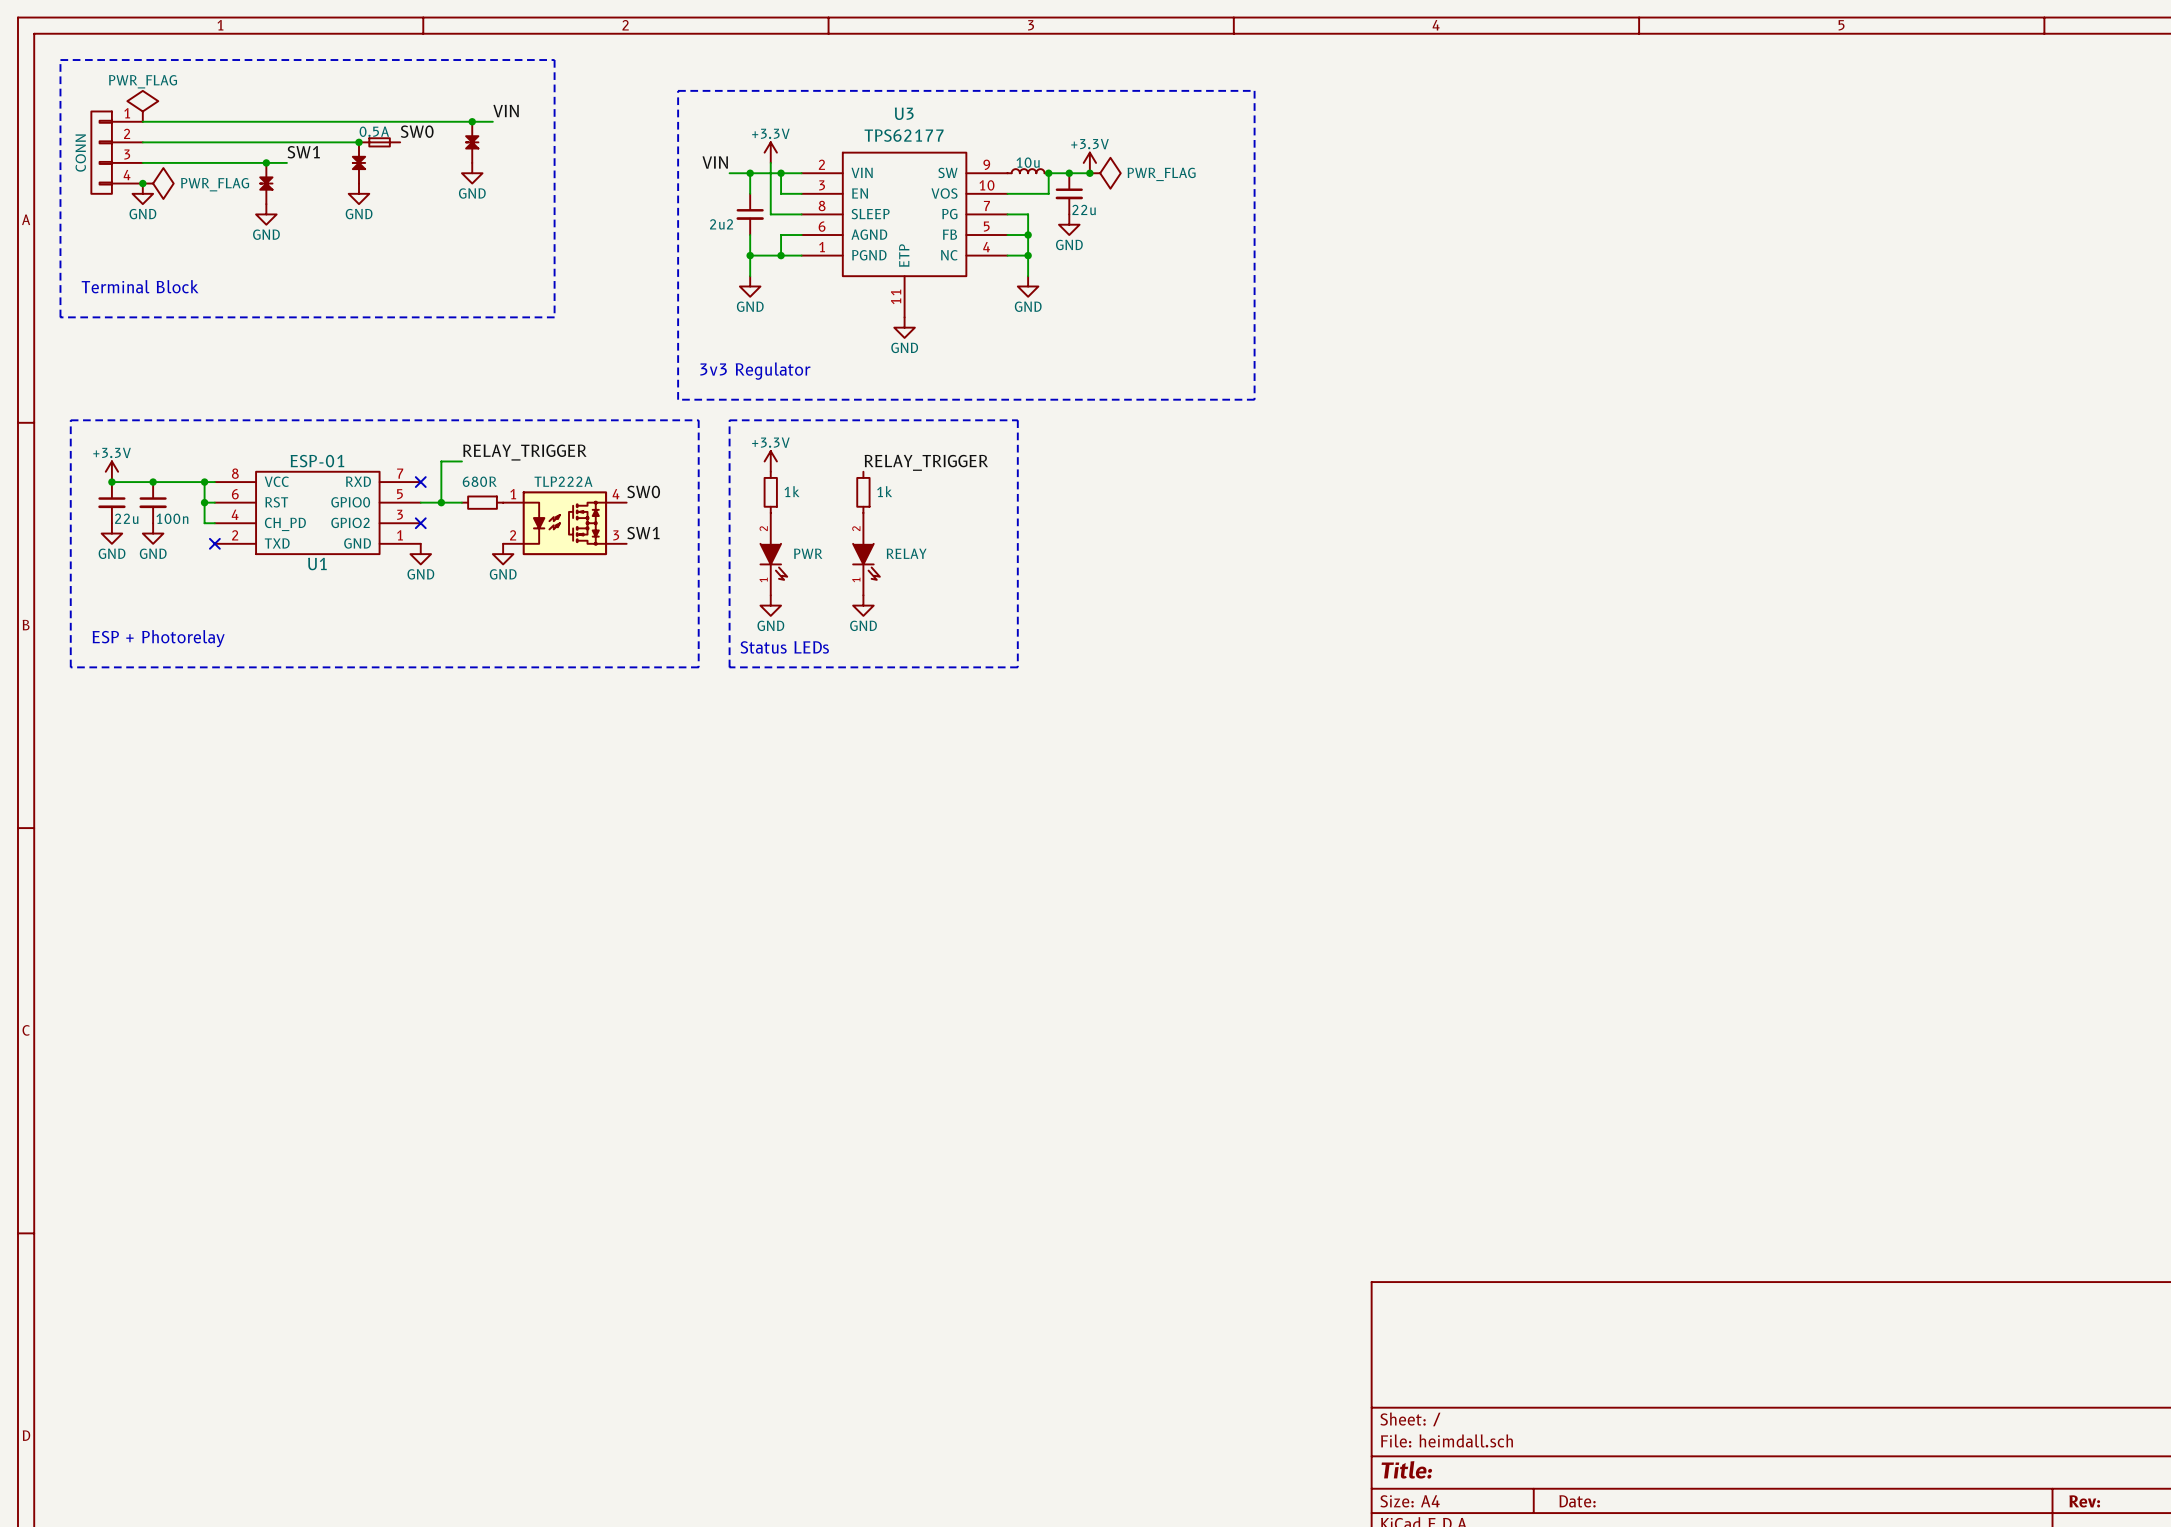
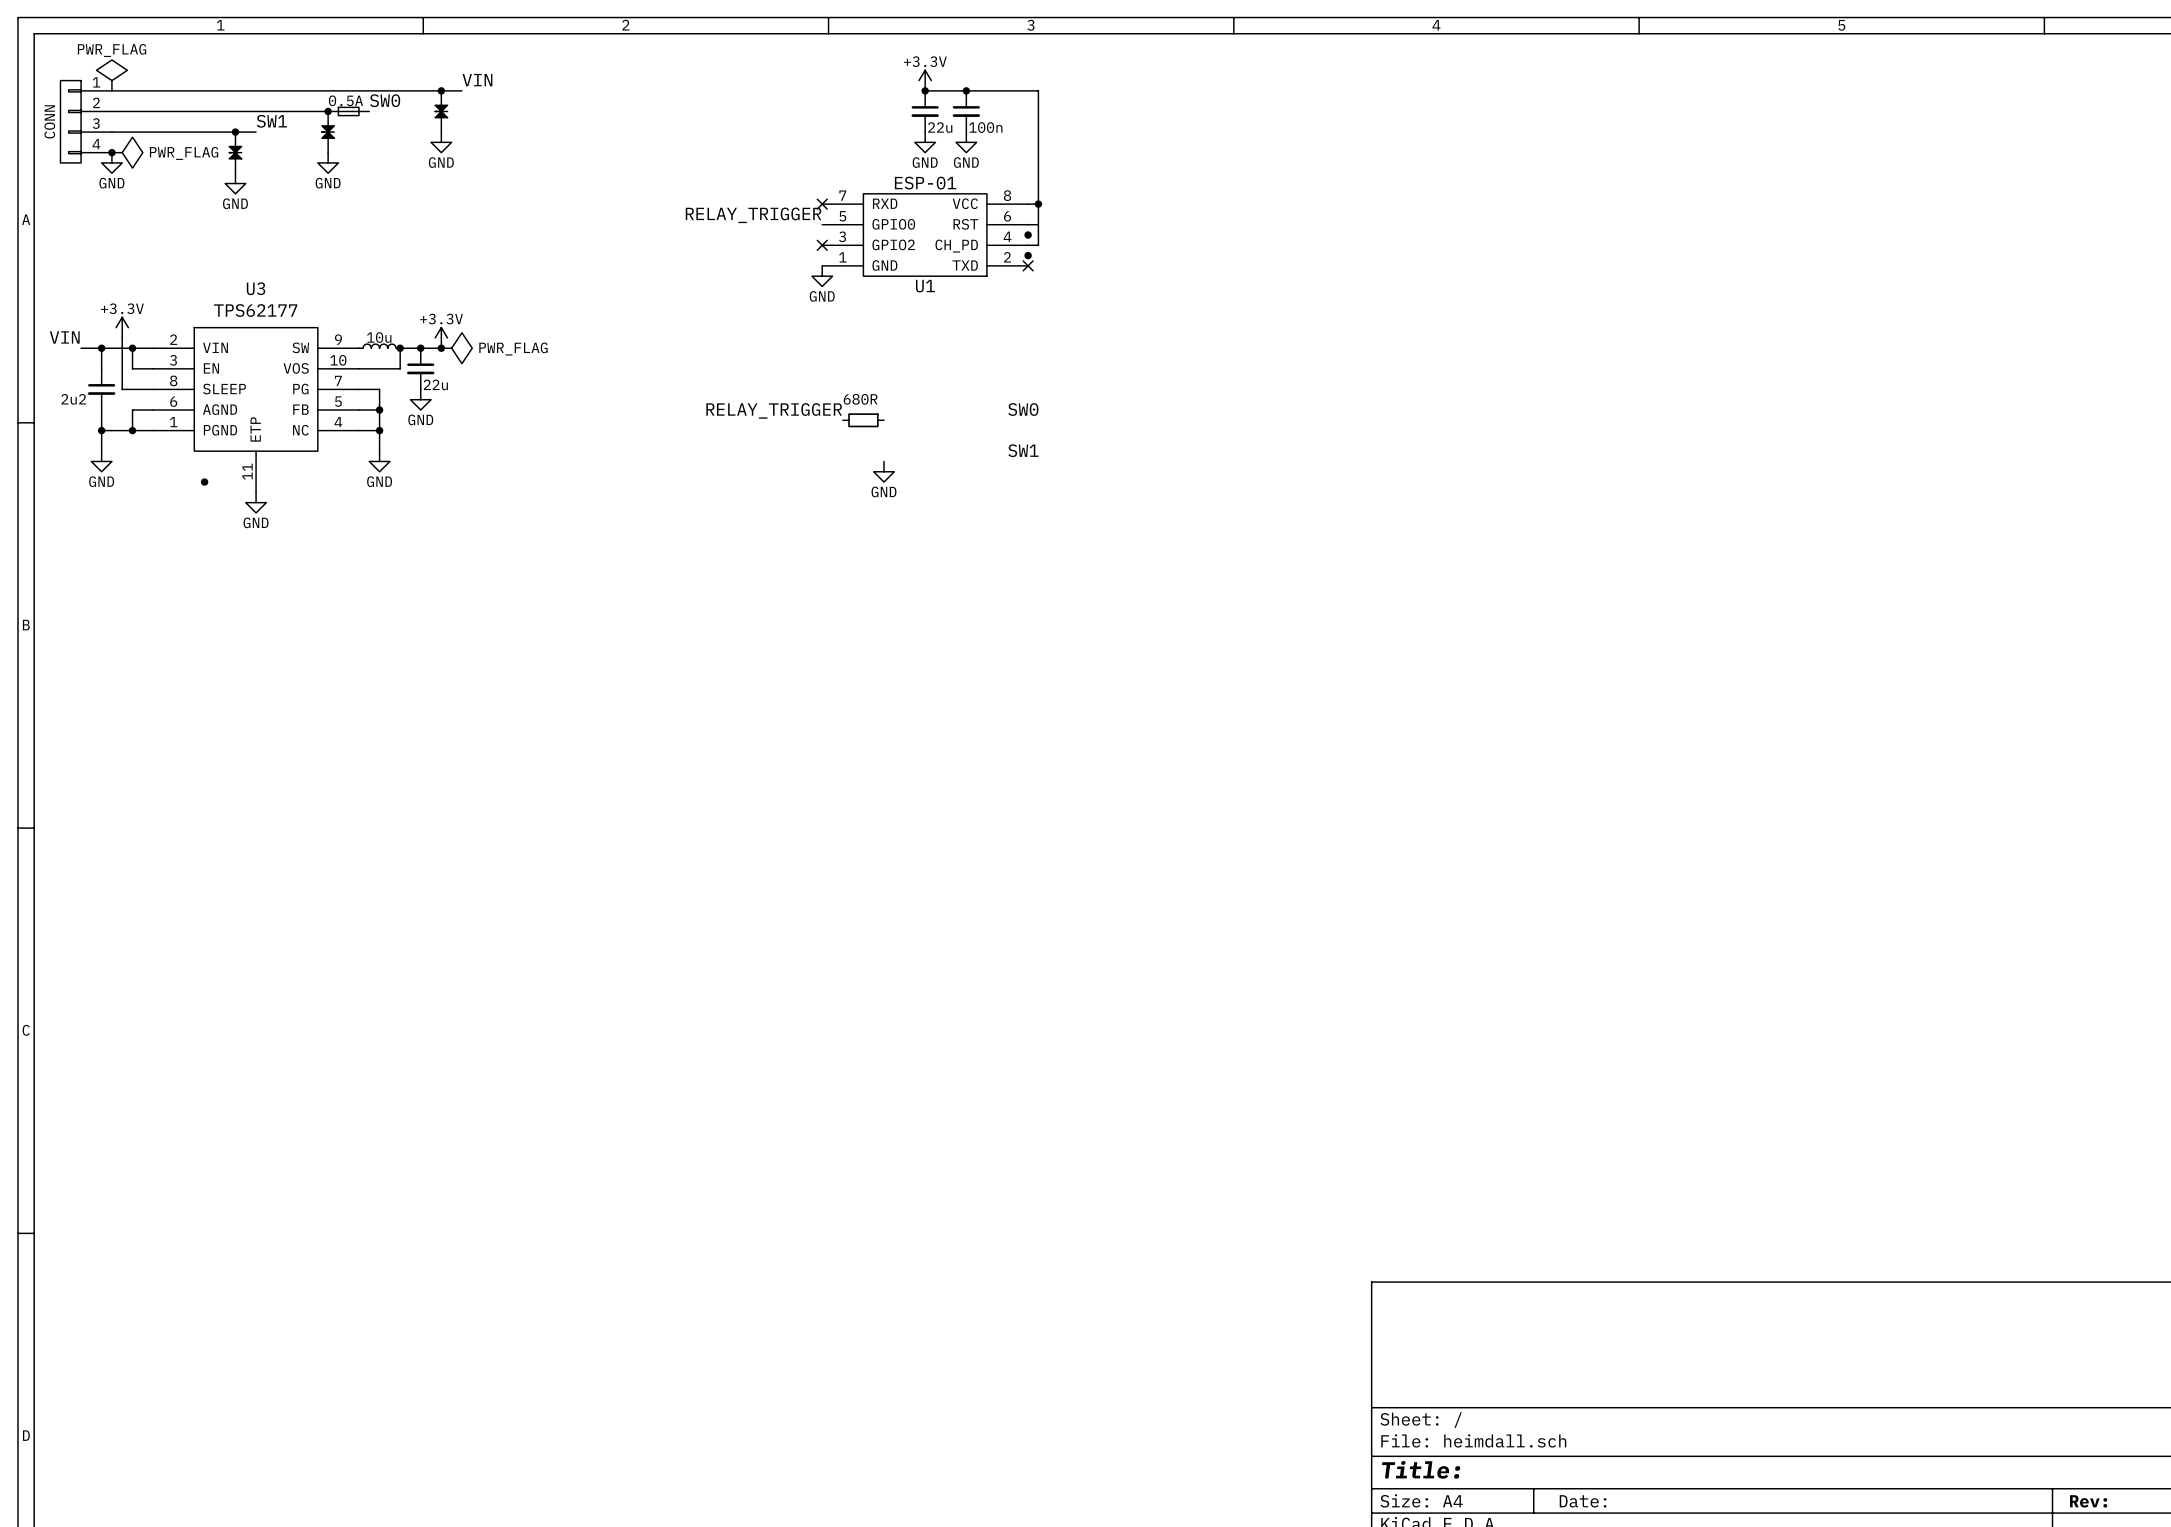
line: (60, 60) (554, 60) (554, 317) (60, 317) (60, 60) -> none
power symbol: none -> PWR_FLAG (111, 75)
power symbol: none -> +3.3V (925, 80)
line: (678, 90) (1254, 90) (1254, 399) (678, 399) (678, 90) -> none
wire: none -> (925, 90) (1038, 90) (1038, 245) (1028, 245)
junction: none -> (925, 90)
junction: none -> (966, 90)
power symbol: PWR_FLAG (142, 106) -> none
junction: none -> (328, 111)
label position: VIN (506, 111) -> VIN (477, 80)
part: none -> 100n (966, 111)
wire: (142, 121) (492, 121) -> (111, 90) (461, 90)
junction position: (472, 121) -> (441, 90)
label position: SW0 (417, 131) -> SW0 (385, 100)
junction: none -> (235, 132)
part: none -> (328, 132)
wire: (142, 142) (359, 142) -> (111, 111) (328, 111)
junction: (359, 142) -> none
part position: (379, 142) -> (348, 111)
part position: (472, 142) -> (441, 111)
power symbol: none -> GND (925, 142)
power symbol: none -> GND (966, 142)
part position: (117, 152) -> (86, 121)
power symbol: none -> PWR_FLAG (127, 152)
part: none -> (235, 152)
label position: SW1 (303, 152) -> SW1 (271, 121)
power symbol: +3.3V (770, 152) -> none
wire: (142, 162) (286, 162) -> (111, 132) (256, 132)
junction: (266, 162) -> none
power symbol: none -> GND (328, 162)
part: (359, 162) -> none
label: VIN (715, 162) -> none
wire: (770, 162) (770, 214) (801, 214) -> none
power symbol: +3.3V (1089, 162) -> none
part: 10u (1028, 171) -> none
power symbol position: GND (472, 173) -> GND (441, 142)
wire: (729, 173) (801, 173) -> none
wire: (750, 173) (750, 193) -> none
junction: (750, 173) -> none
wire: (781, 173) (781, 193) (801, 193) -> none
junction: (781, 173) -> none
junction: (1048, 173) -> none
junction: (1069, 173) -> none
wire: (1089, 173) (1048, 173) (1048, 193) (1007, 193) -> none
junction: (1089, 173) -> none
power symbol: PWR_FLAG (1105, 173) -> none
junction position: (142, 183) -> (111, 152)
power symbol: PWR_FLAG (158, 183) -> none
power symbol: none -> GND (235, 183)
part: (266, 183) -> none
power symbol position: GND (142, 193) -> GND (111, 162)
power symbol: GND (359, 193) -> none
part position: (1069, 193) -> (925, 111)
no-connect mark: none -> (822, 204)
wire: none -> (1028, 204) (1038, 204)
junction: none -> (1038, 204)
power symbol: GND (266, 214) -> none
part: 2u2 (750, 214) -> none
wire: (1007, 214) (1028, 214) (1028, 276) -> none
label: none -> RELAY_TRIGGER (753, 215)
wire: none -> (1028, 224) (1038, 224)
power symbol: GND (1069, 224) -> none
wire: (750, 235) (750, 276) -> none
wire: (801, 235) (781, 235) (781, 255) -> none
U3 position: (904, 235) -> (256, 410)
wire: (1007, 235) (1028, 235) -> none
no-connect mark: none -> (822, 245)
wire: (750, 255) (801, 255) -> none
junction: (750, 255) -> none
junction: (781, 255) -> none
wire: (1007, 255) (1028, 255) -> none
no-connect mark: none -> (1028, 265)
power symbol: none -> GND (822, 276)
text: Terminal Block (140, 286) -> none
power symbol: GND (750, 286) -> none
power symbol: GND (1028, 286) -> none
power symbol: GND (904, 327) -> none
label: none -> VIN (64, 337)
wire: none -> (122, 337) (122, 389) (153, 389)
power symbol: none -> +3.3V (441, 337)
part: none -> 10u (379, 346)
wire: none -> (81, 348) (153, 348)
wire: none -> (101, 348) (101, 368)
junction: none -> (101, 348)
wire: none -> (132, 348) (132, 368) (153, 368)
junction: none -> (132, 348)
junction: none -> (400, 348)
junction: none -> (420, 348)
wire: none -> (441, 348) (400, 348) (400, 368) (359, 368)
junction: none -> (441, 348)
power symbol: none -> PWR_FLAG (456, 348)
part: none -> 22u (420, 368)
text: 3v3 Regulator (755, 371) -> none
part: none -> 2u2 (101, 389)
wire: none -> (359, 389) (379, 389) (379, 451)
power symbol: none -> GND (420, 399)
label: none -> SW0 (1023, 409)
wire: none -> (101, 410) (101, 451)
wire: none -> (153, 410) (132, 410) (132, 430)
wire: none -> (359, 410) (379, 410)
junction: none -> (379, 410)
line: (70, 420) (698, 420) (698, 667) (70, 667) (70, 420) -> none
line: (729, 420) (1017, 420) (1017, 667) (729, 667) (729, 420) -> none
part: none -> 680R (863, 420)
wire: none -> (101, 430) (153, 430)
junction: none -> (101, 430)
junction: none -> (132, 430)
wire: none -> (359, 430) (379, 430)
junction: none -> (379, 430)
label: none -> SW1 (1023, 450)
label: RELAY_TRIGGER (524, 452) -> none
power symbol: none -> GND (101, 461)
power symbol: none -> GND (379, 461)
wire: (461, 461) (441, 461) (441, 502) -> none
power symbol: +3.3V (770, 461) -> none
label position: RELAY_TRIGGER (926, 462) -> RELAY_TRIGGER (774, 410)
power symbol position: +3.3V (111, 471) -> +3.3V (122, 327)
power symbol: none -> GND (883, 471)
wire: (111, 482) (214, 482) -> none
junction: (111, 482) -> none
junction: (153, 482) -> none
wire: (204, 482) (204, 523) (214, 523) -> none
no-connect mark: (420, 482) -> none
label: SW0 (643, 491) -> none
part: 1k (770, 492) -> none
part: 1k (863, 492) -> none
part: 22u (111, 502) -> none
part: 100n (153, 502) -> none
wire: (204, 502) (214, 502) -> none
junction: (204, 502) -> none
power symbol: none -> GND (256, 502)
wire: (420, 502) (461, 502) -> none
junction: (441, 502) -> none
part: 680R (482, 502) -> none
U1 flip: as is (317, 512) -> left-right (925, 235)
U1 position: (317, 512) -> (925, 235)
no-connect mark: (420, 523) -> none
part: TLP222A (564, 523) -> none
power symbol: GND (111, 533) -> none
power symbol: GND (153, 533) -> none
label: SW1 (643, 533) -> none
no-connect mark: (214, 543) -> none
power symbol: GND (420, 554) -> none
power symbol: GND (503, 554) -> none
part: PWR (773, 554) -> none
part: RELAY (866, 554) -> none
power symbol: GND (770, 605) -> none
power symbol: GND (863, 605) -> none
text: ESP + Photorelay (158, 638) -> none
text: Status LEDs (784, 647) -> none

